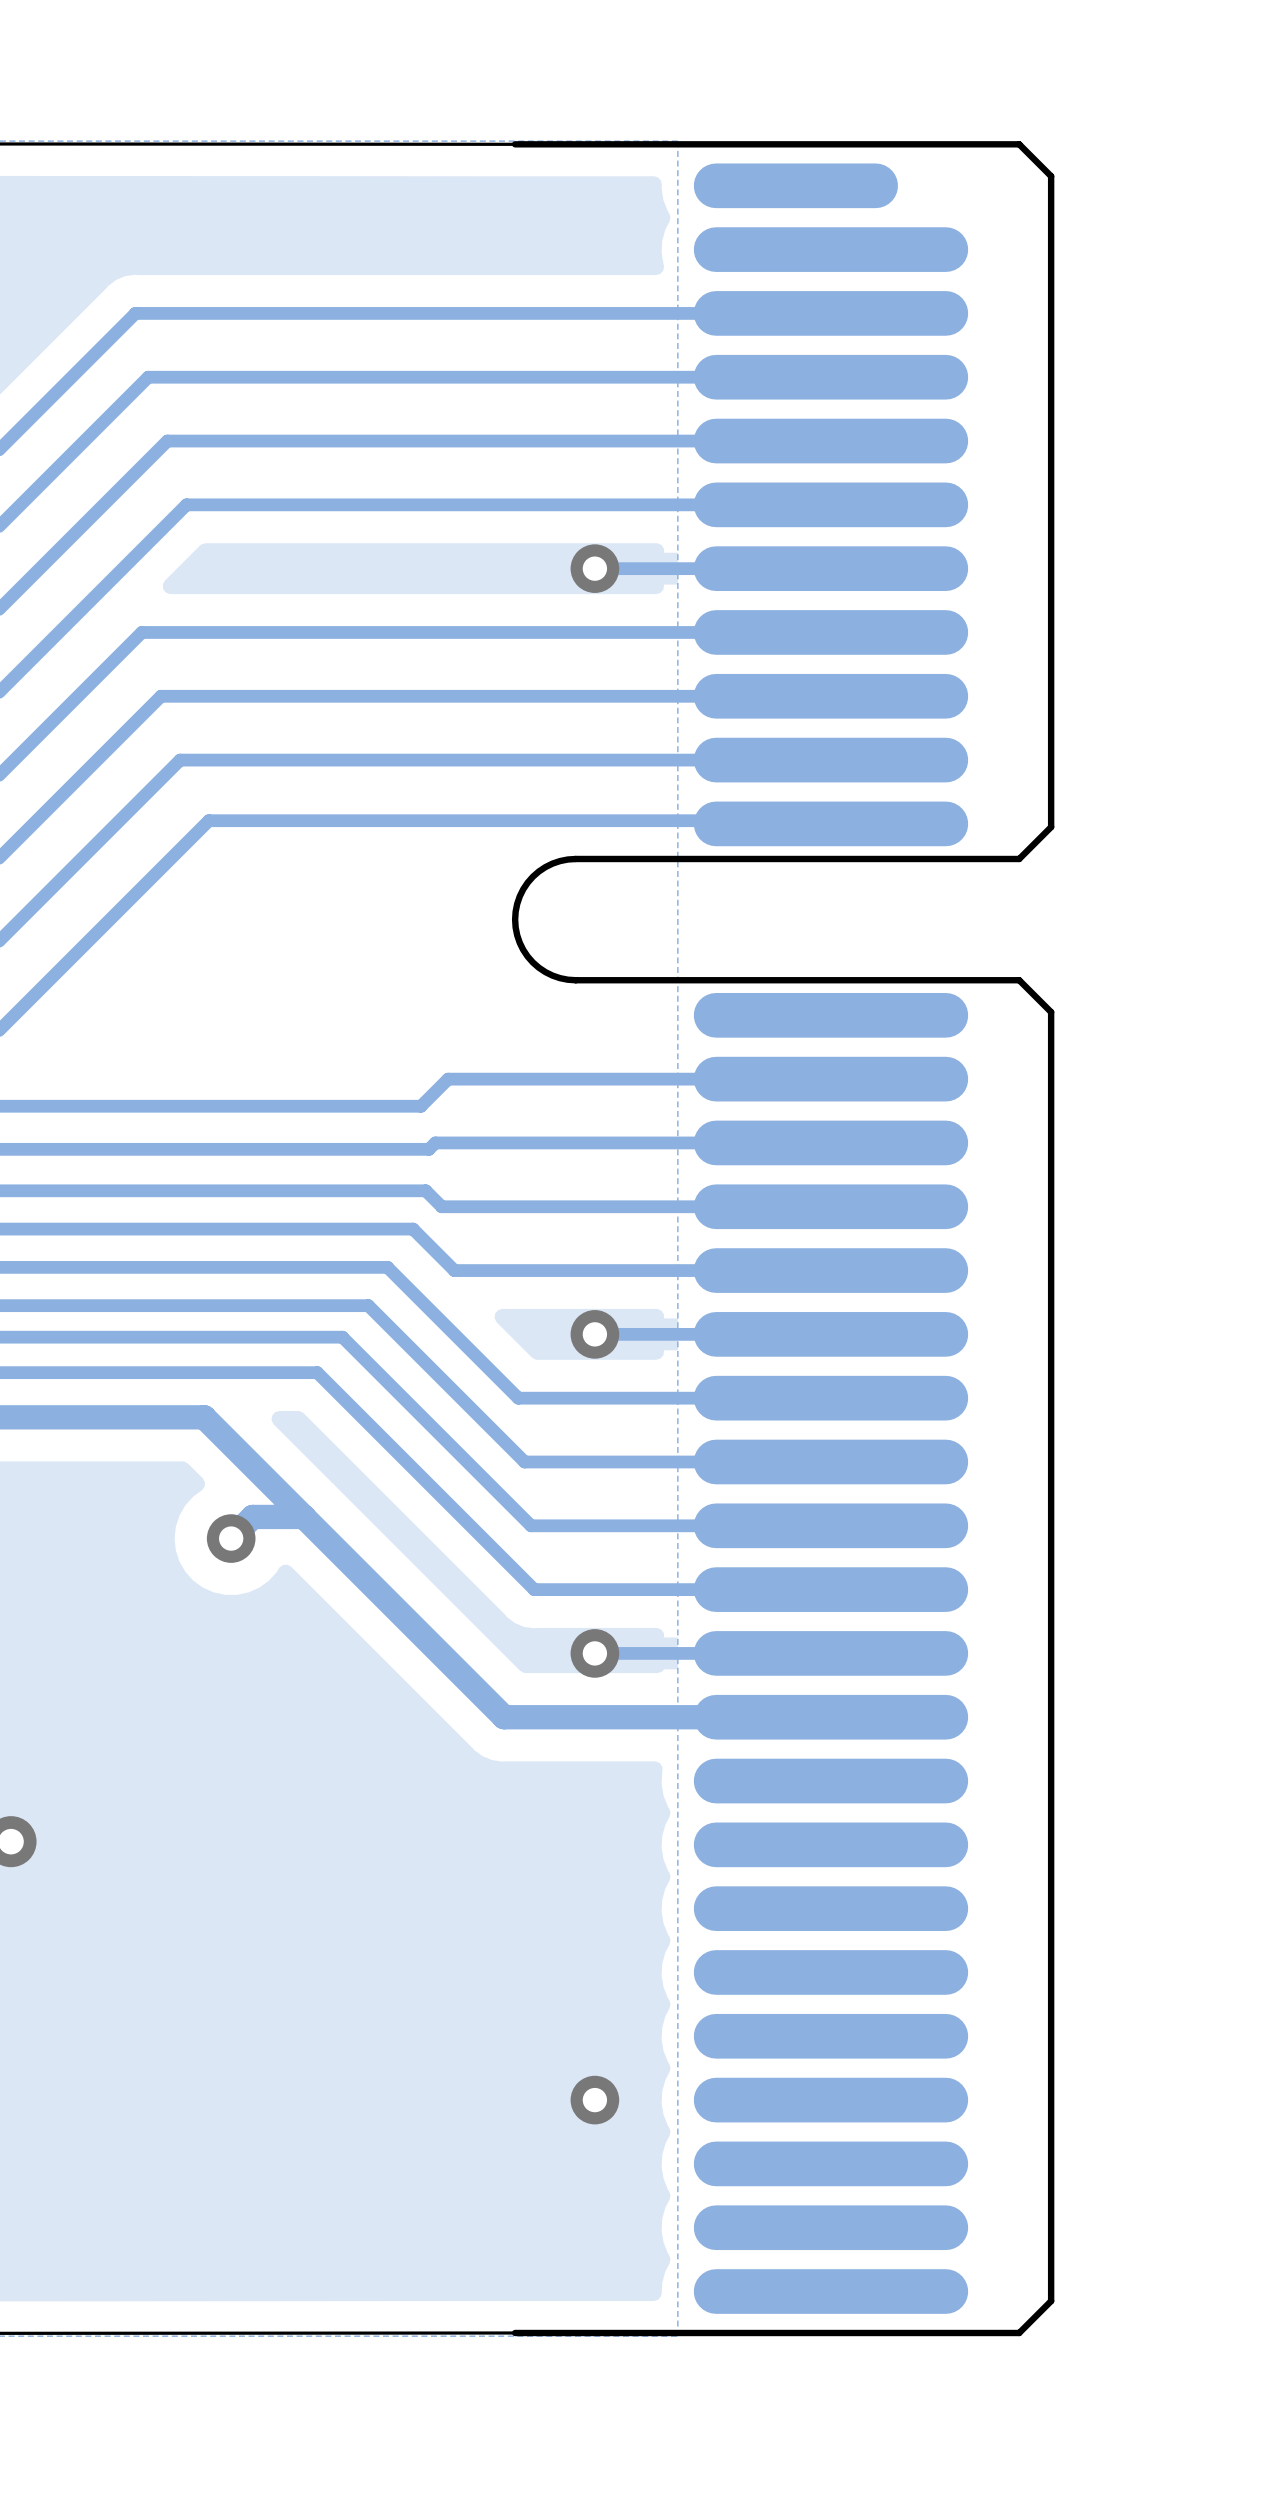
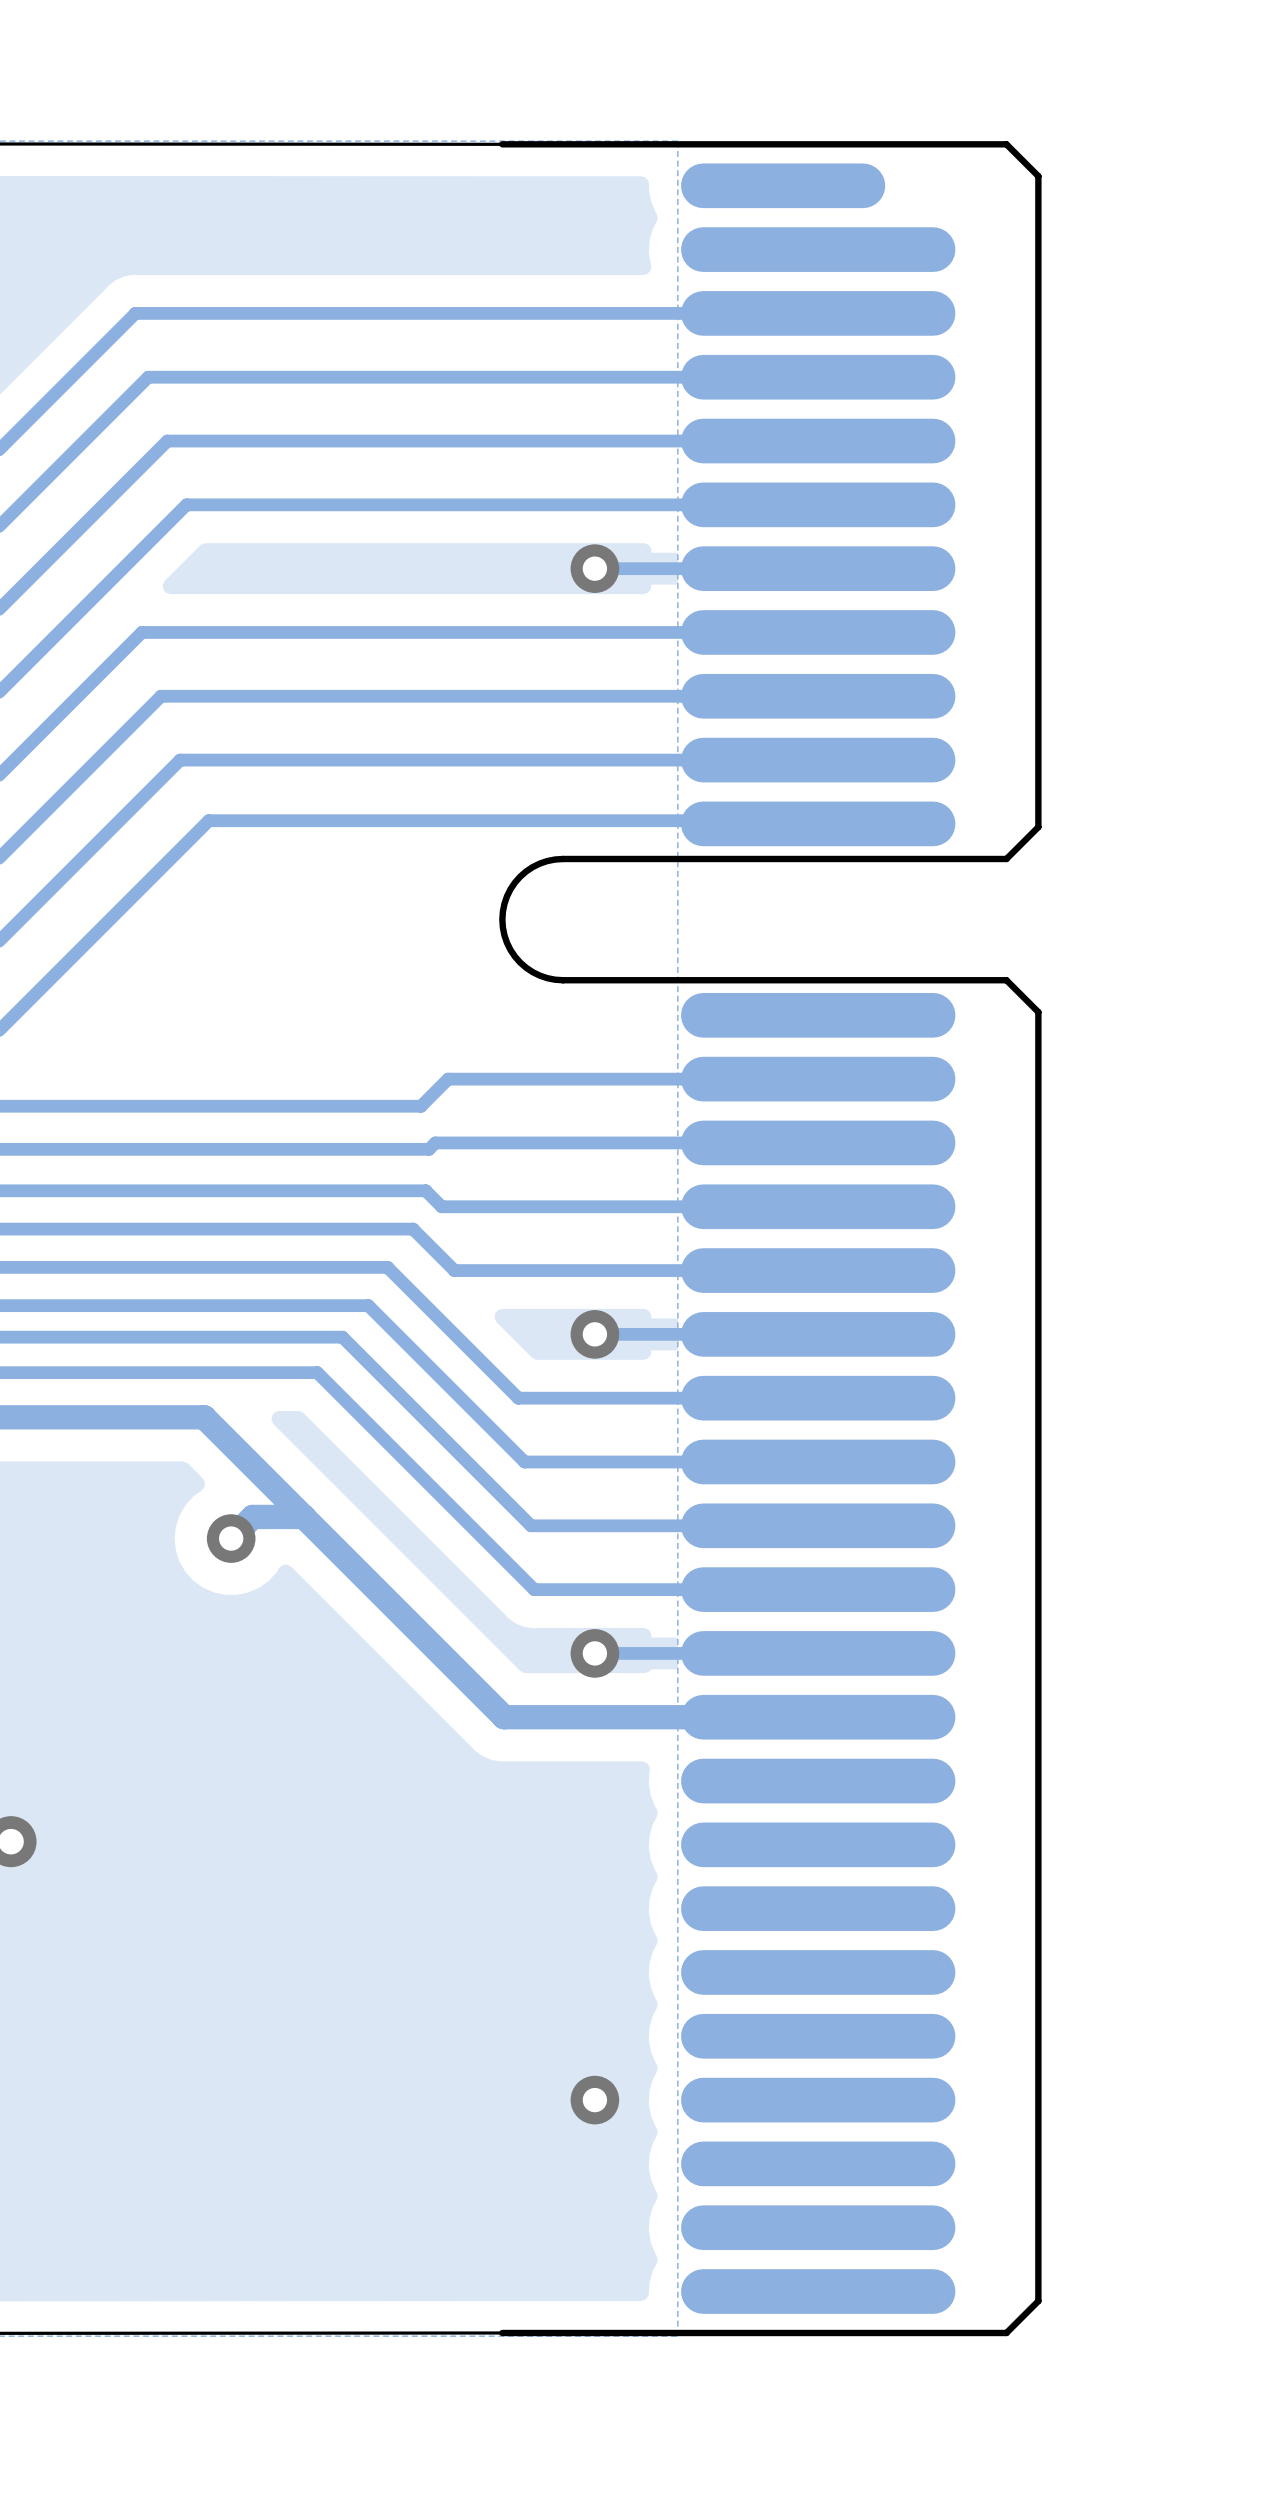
part position: (783, 1238) -> (770, 1238)

